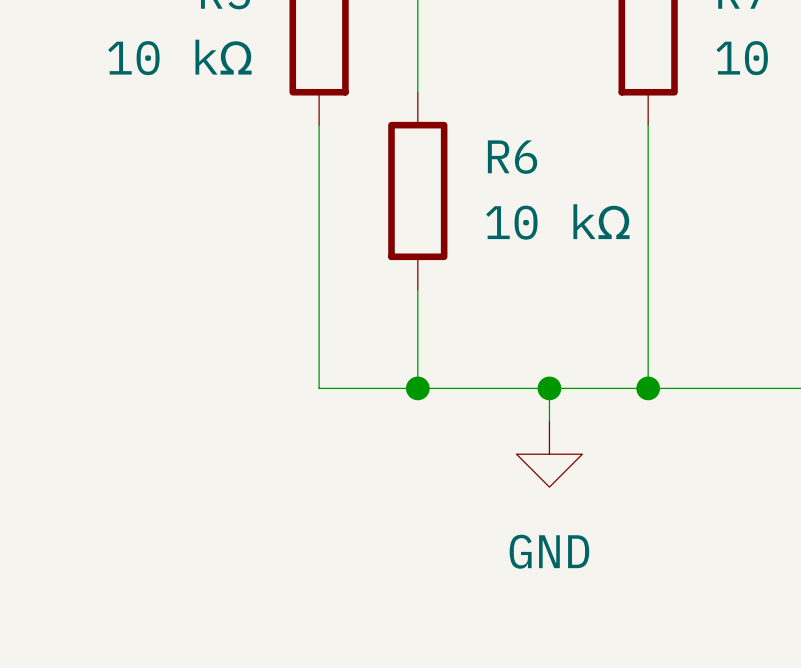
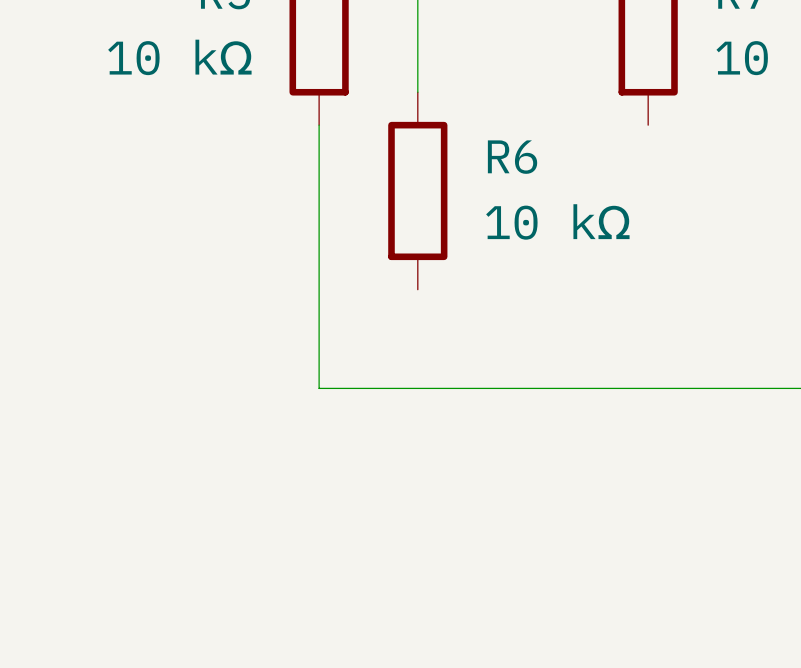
wire: (648, 125) (648, 388) -> none
wire: (417, 289) (417, 388) -> none
junction: (417, 388) -> none
wire: (549, 388) (549, 421) -> none
junction: (549, 388) -> none
junction: (648, 388) -> none
power symbol: GND (549, 454) -> none

